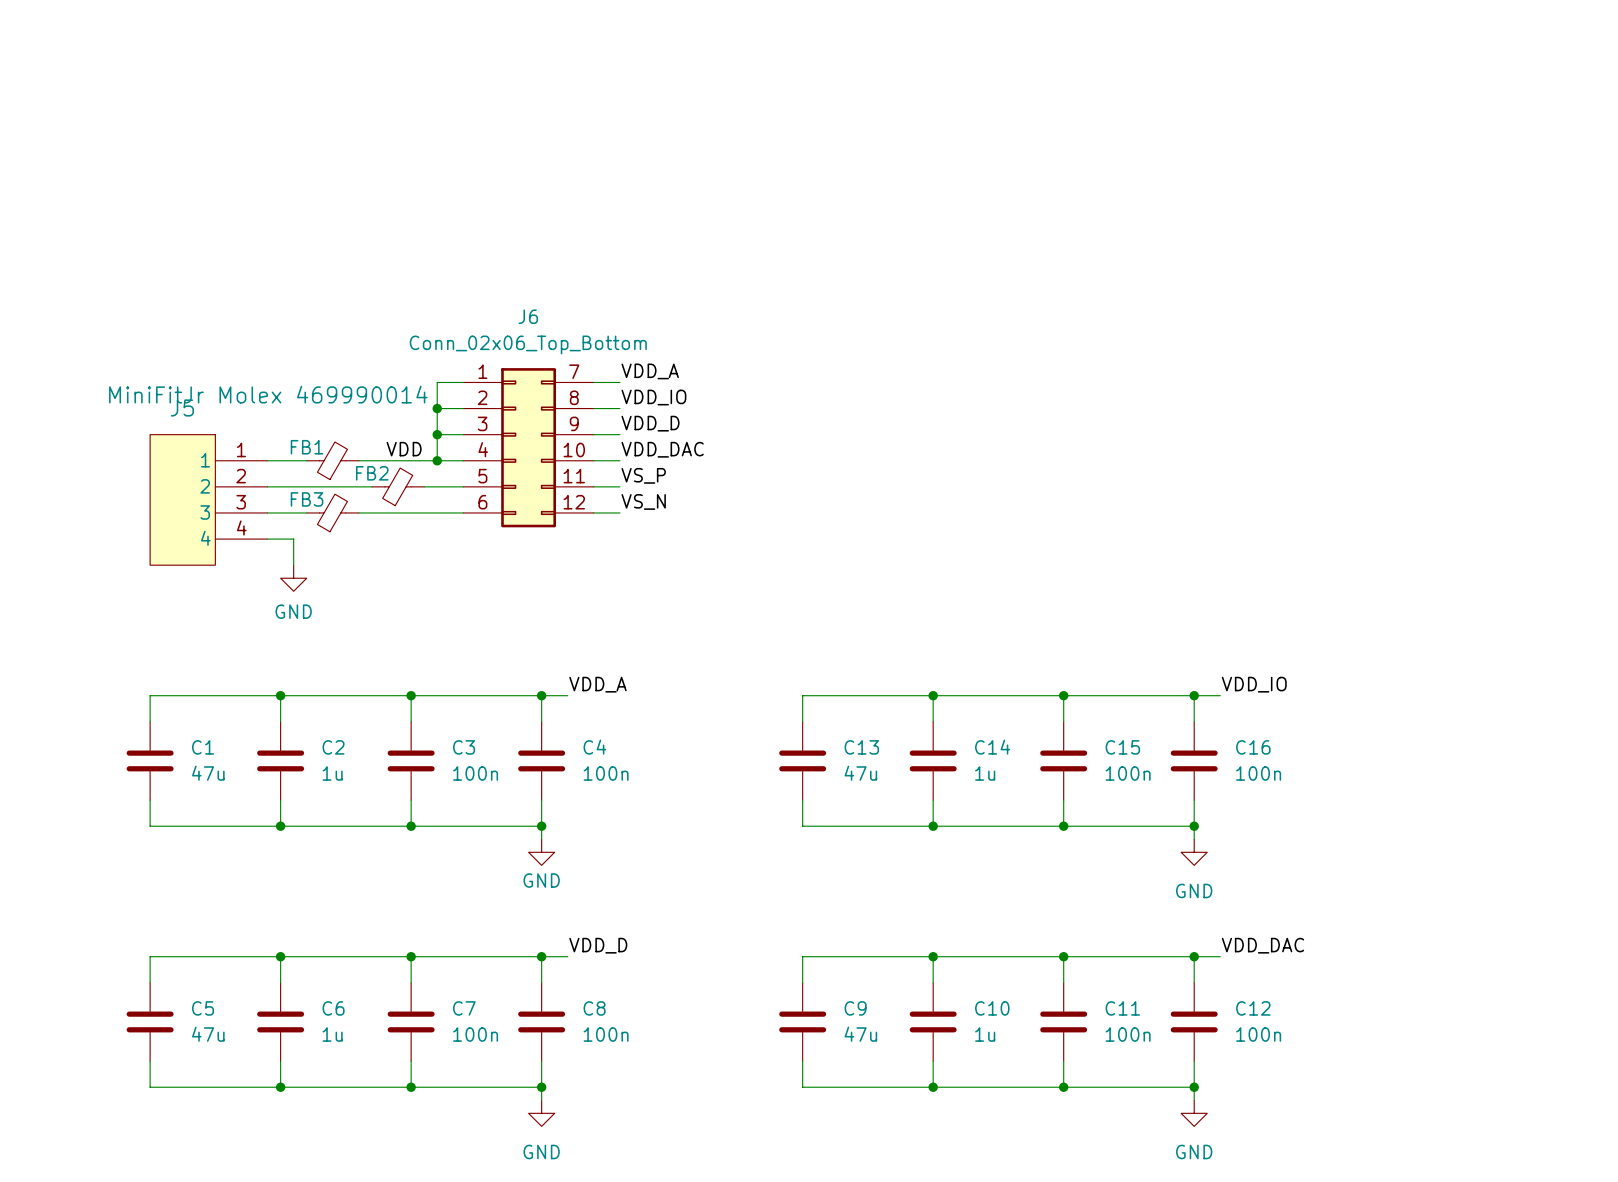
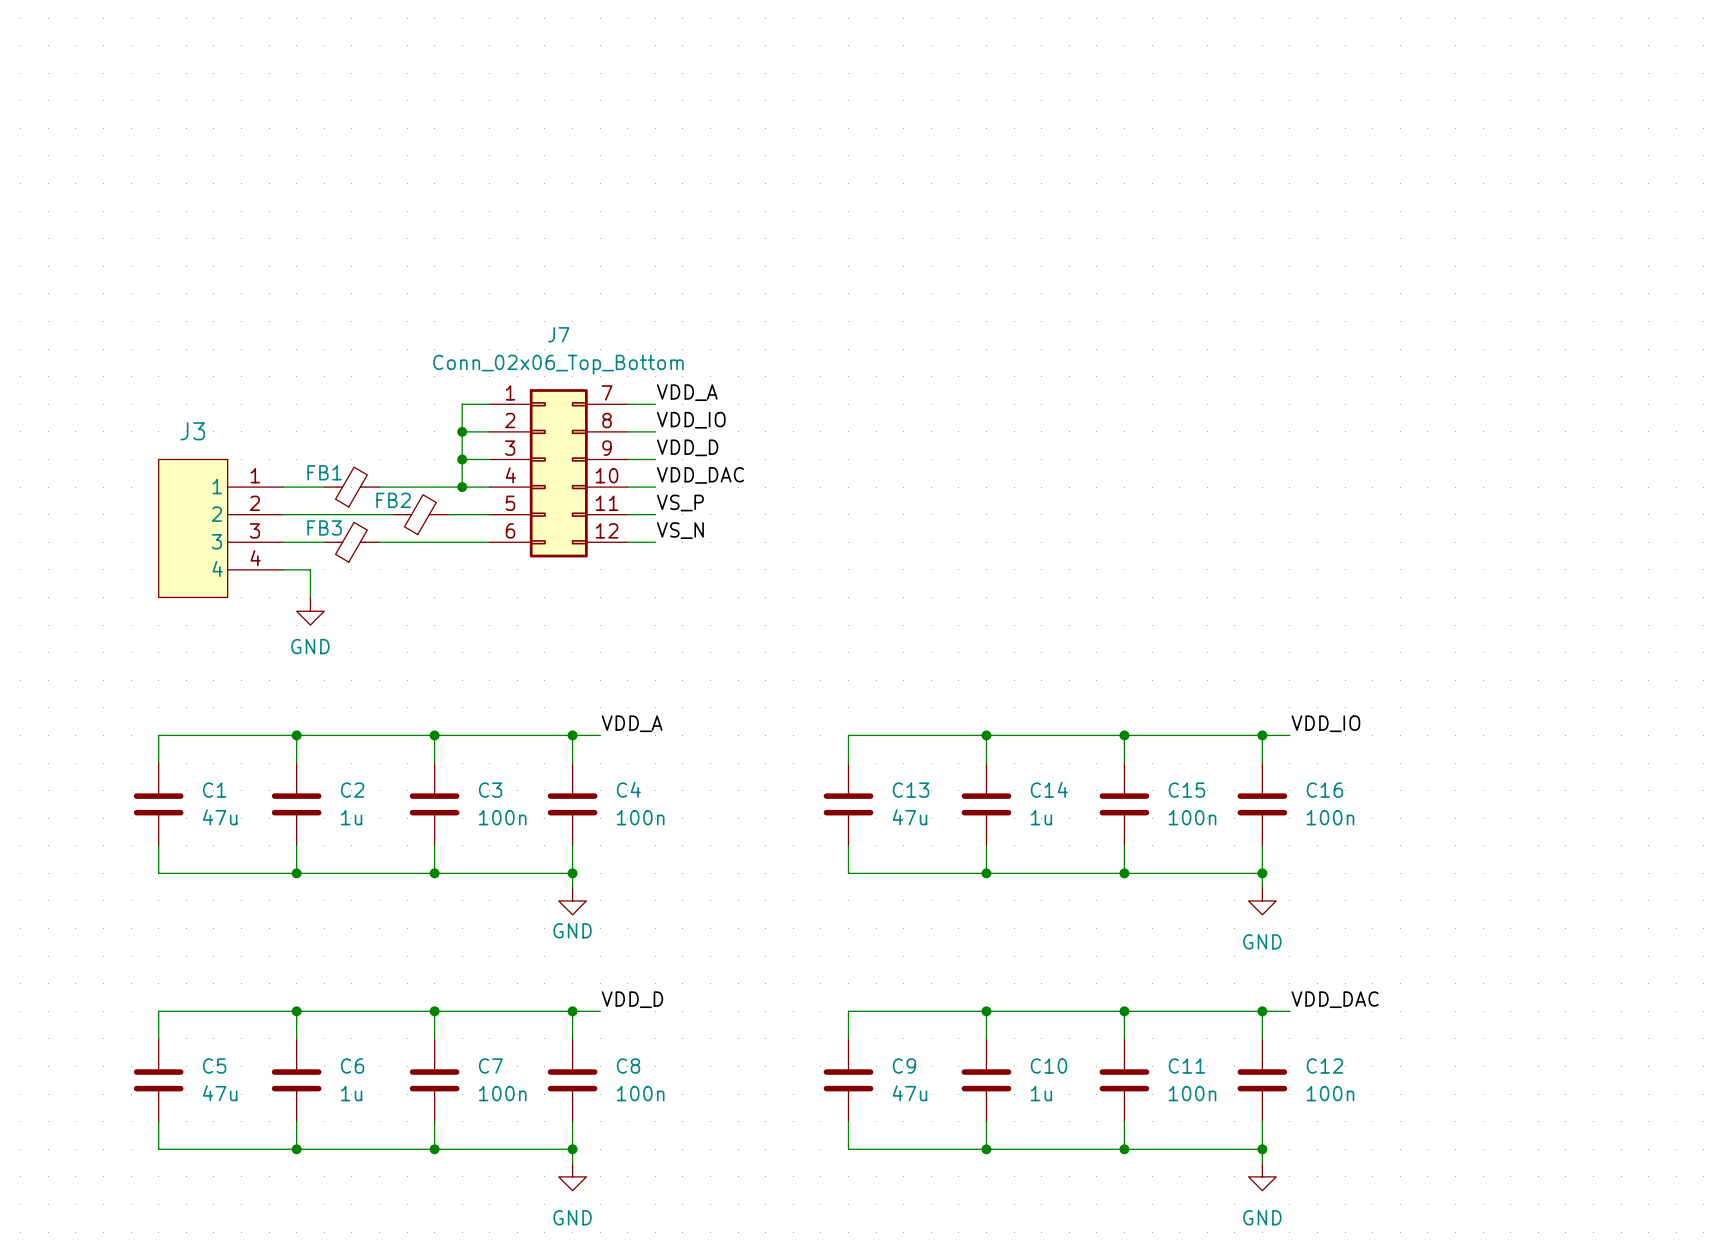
J6 name: J6 (528, 316) -> J7 (558, 334)
J5 value: MiniFitJr Molex 469990014 (268, 394) -> none
J5 name: J5 (182, 407) -> J3 (192, 431)
label: VDD (404, 449) -> none

